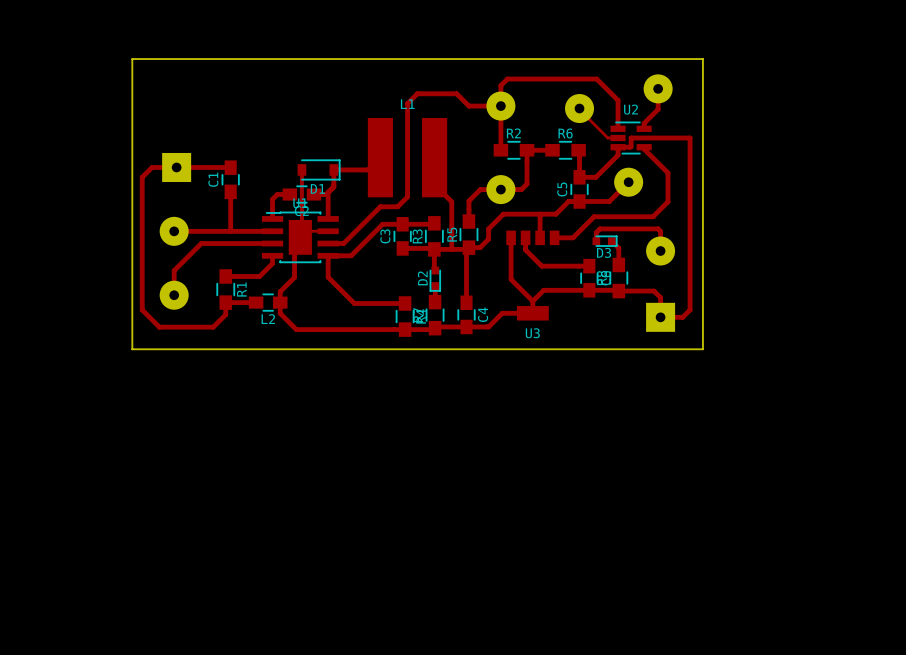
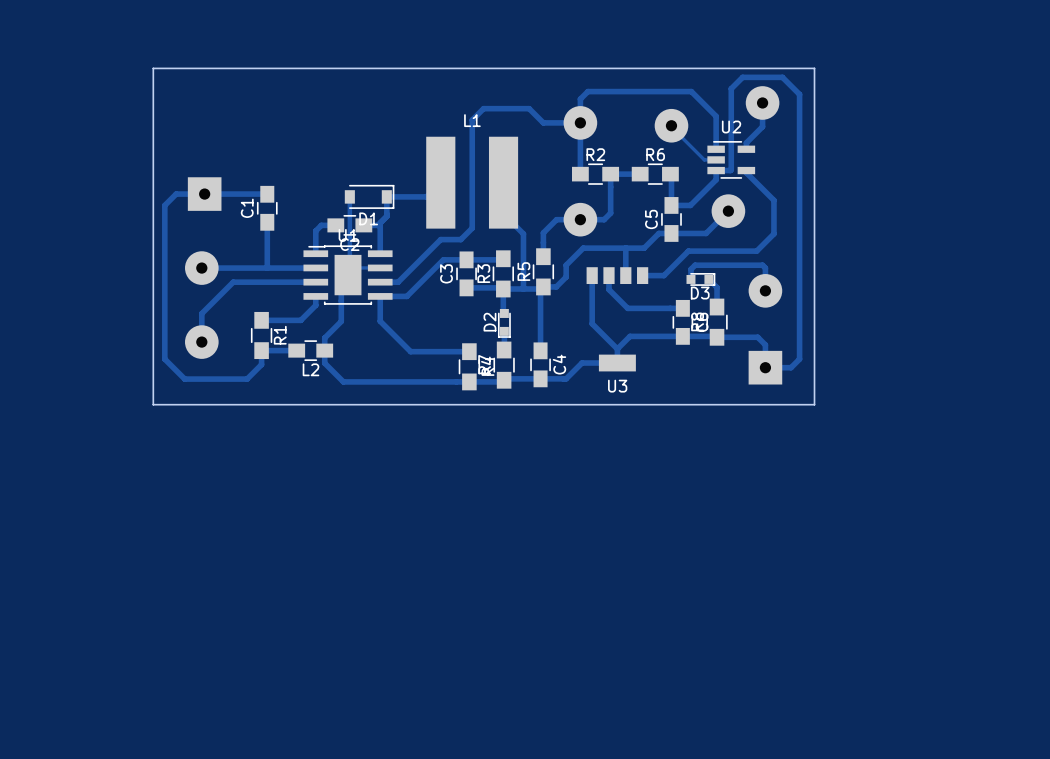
track: (631, 138) (690, 138) -> (731, 159) (731, 88) (742, 77) (782, 77) (799, 94) (799, 159)

